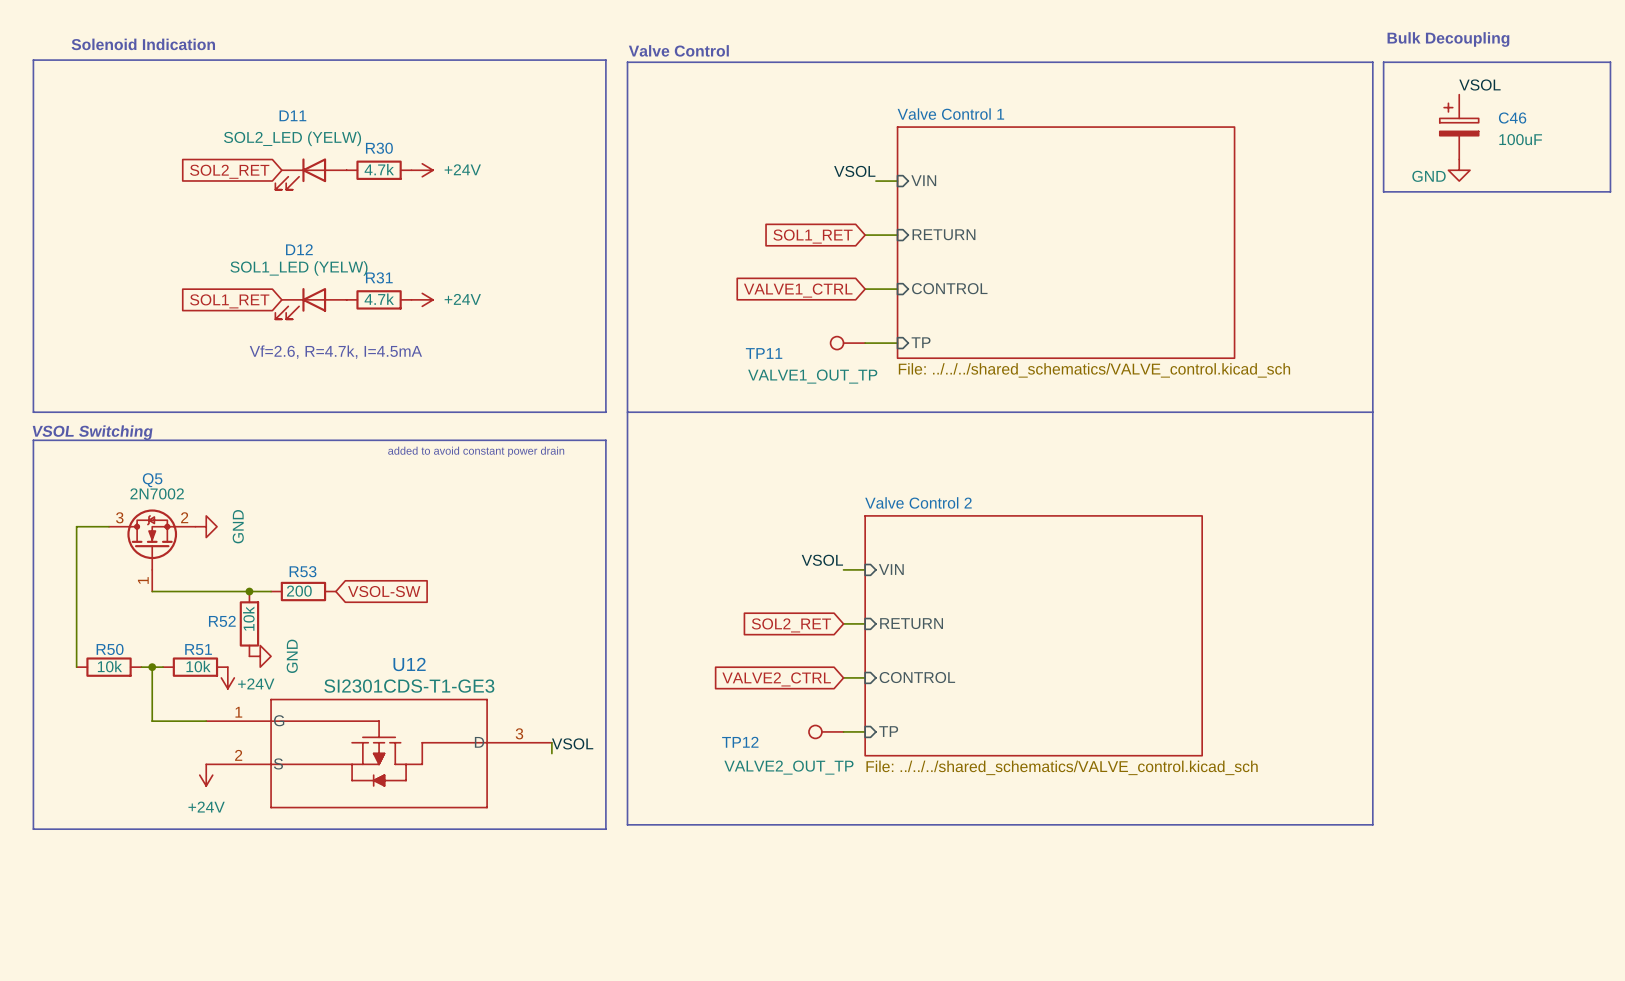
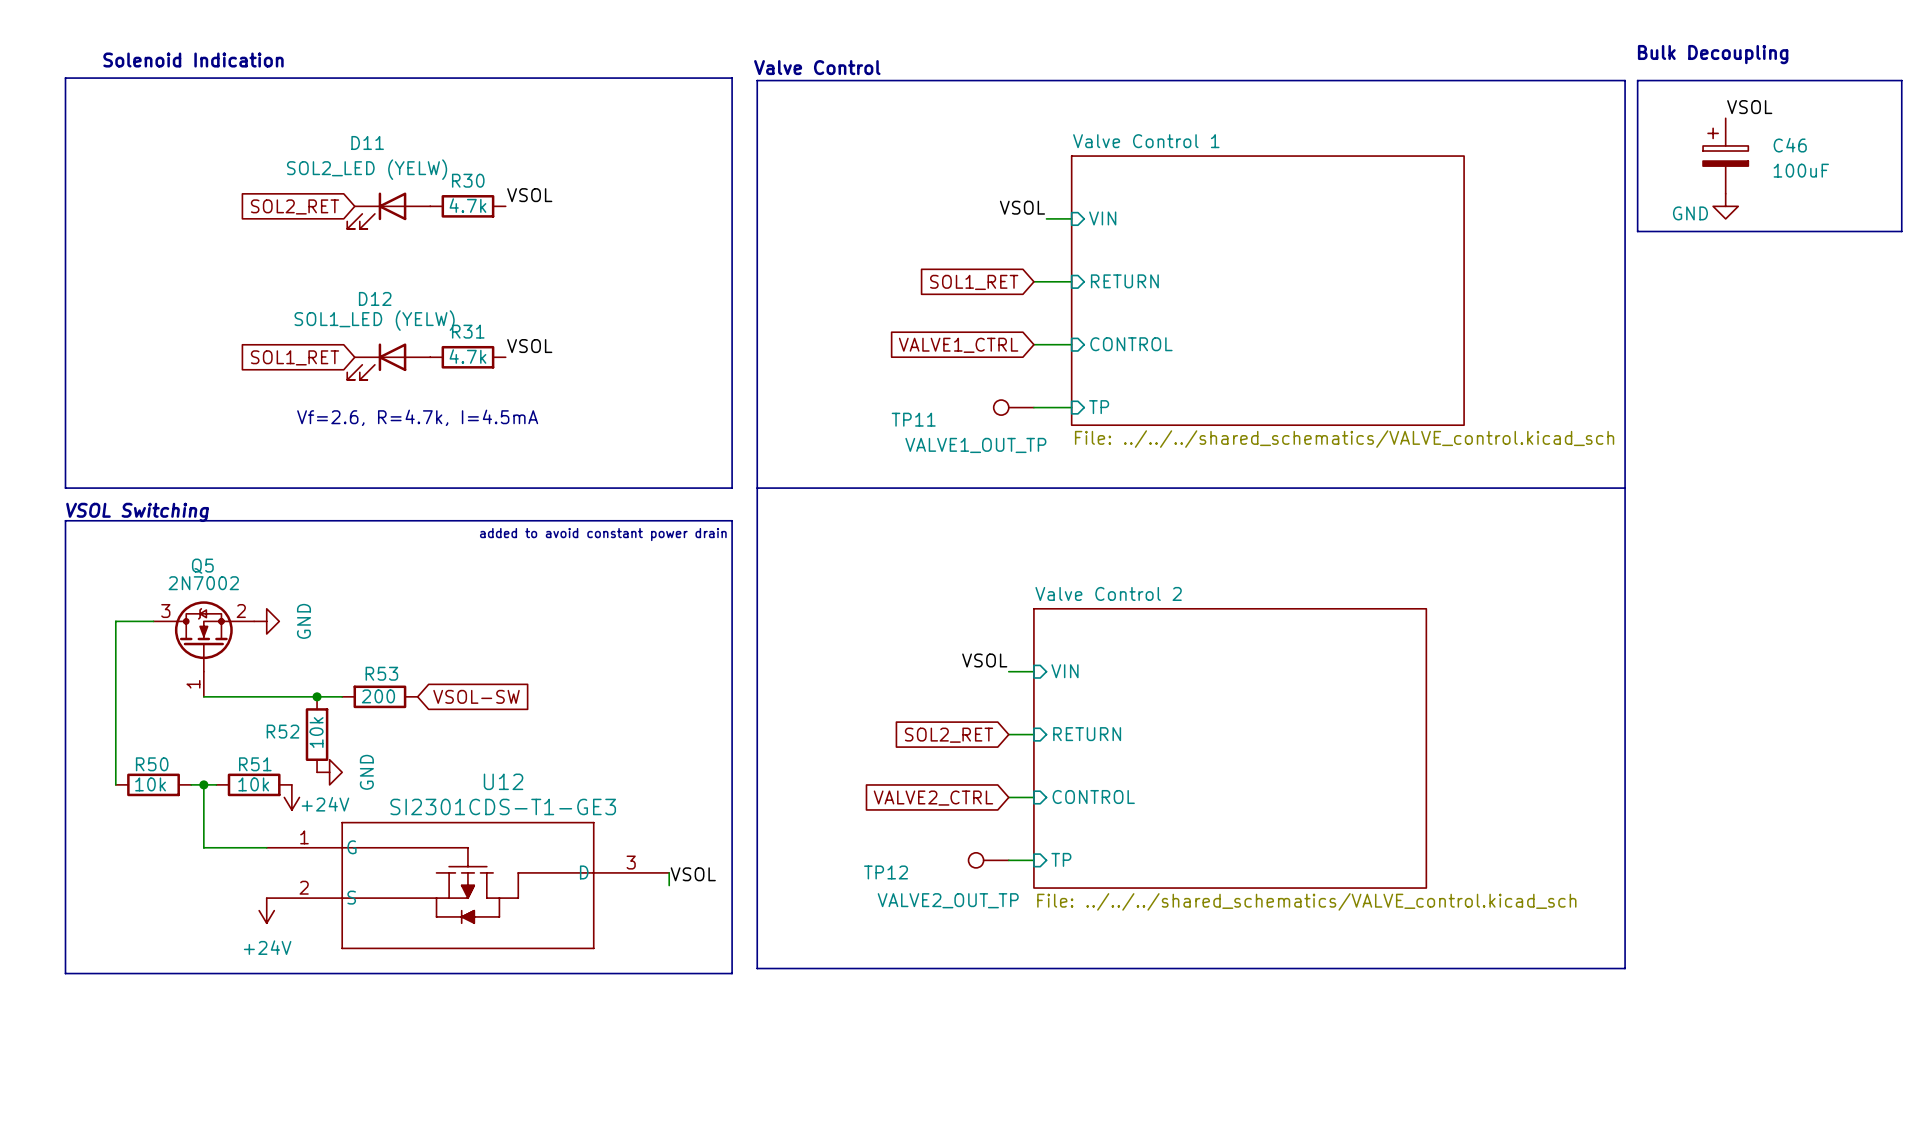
label: none -> VSOL (529, 195)
power symbol: +24V (422, 170) -> none
label: none -> VSOL (529, 346)
power symbol: +24V (422, 299) -> none

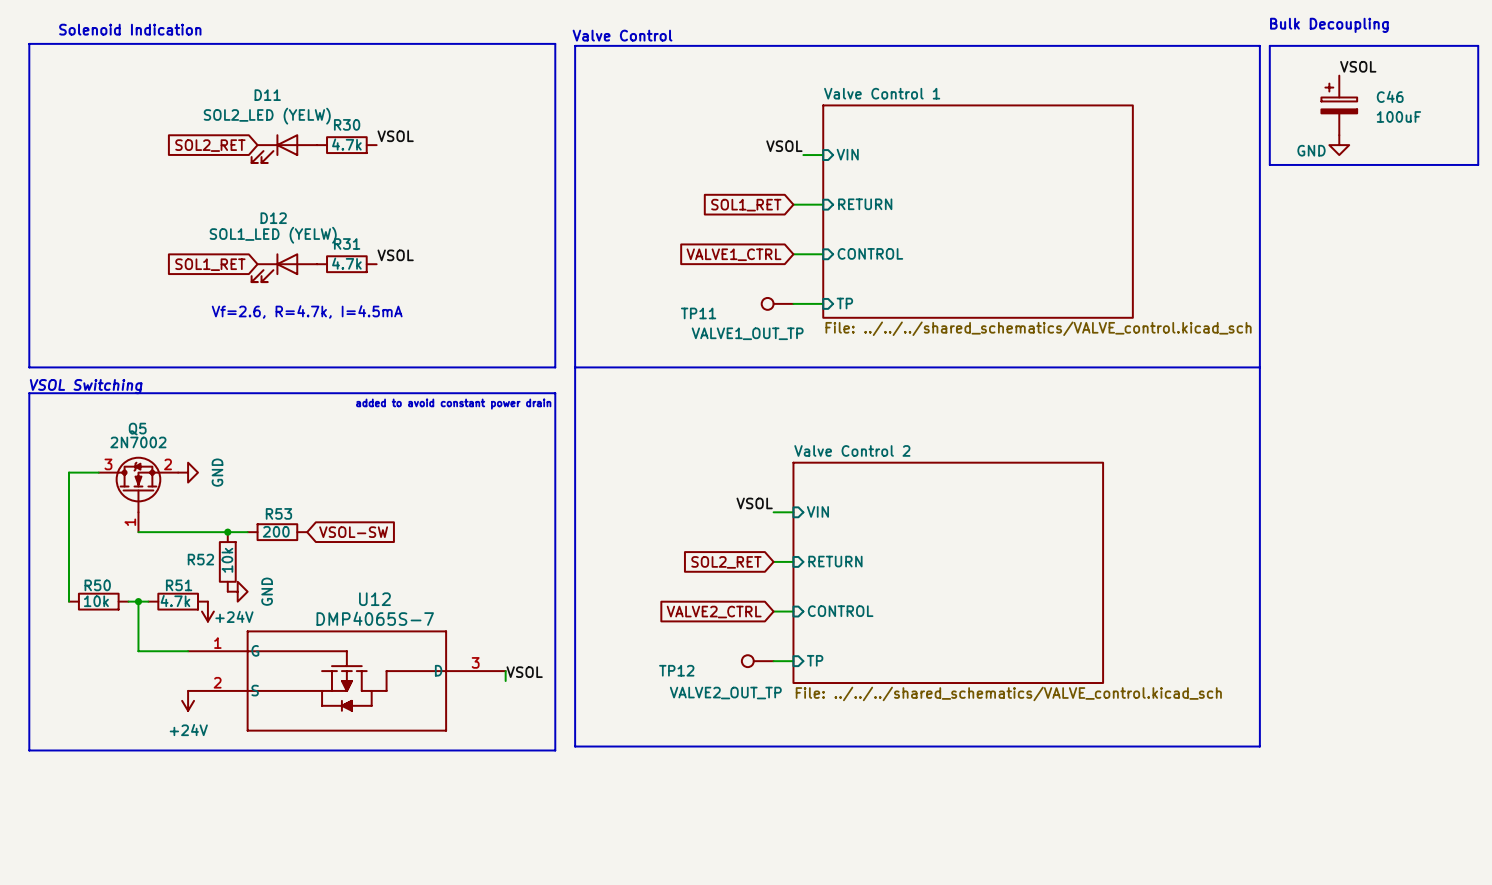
R51 value: 10k (253, 784) -> 4.7k (175, 601)
U12 value: SI2301CDS-T1-GE3 (503, 806) -> DMP4065S-7 (375, 618)

